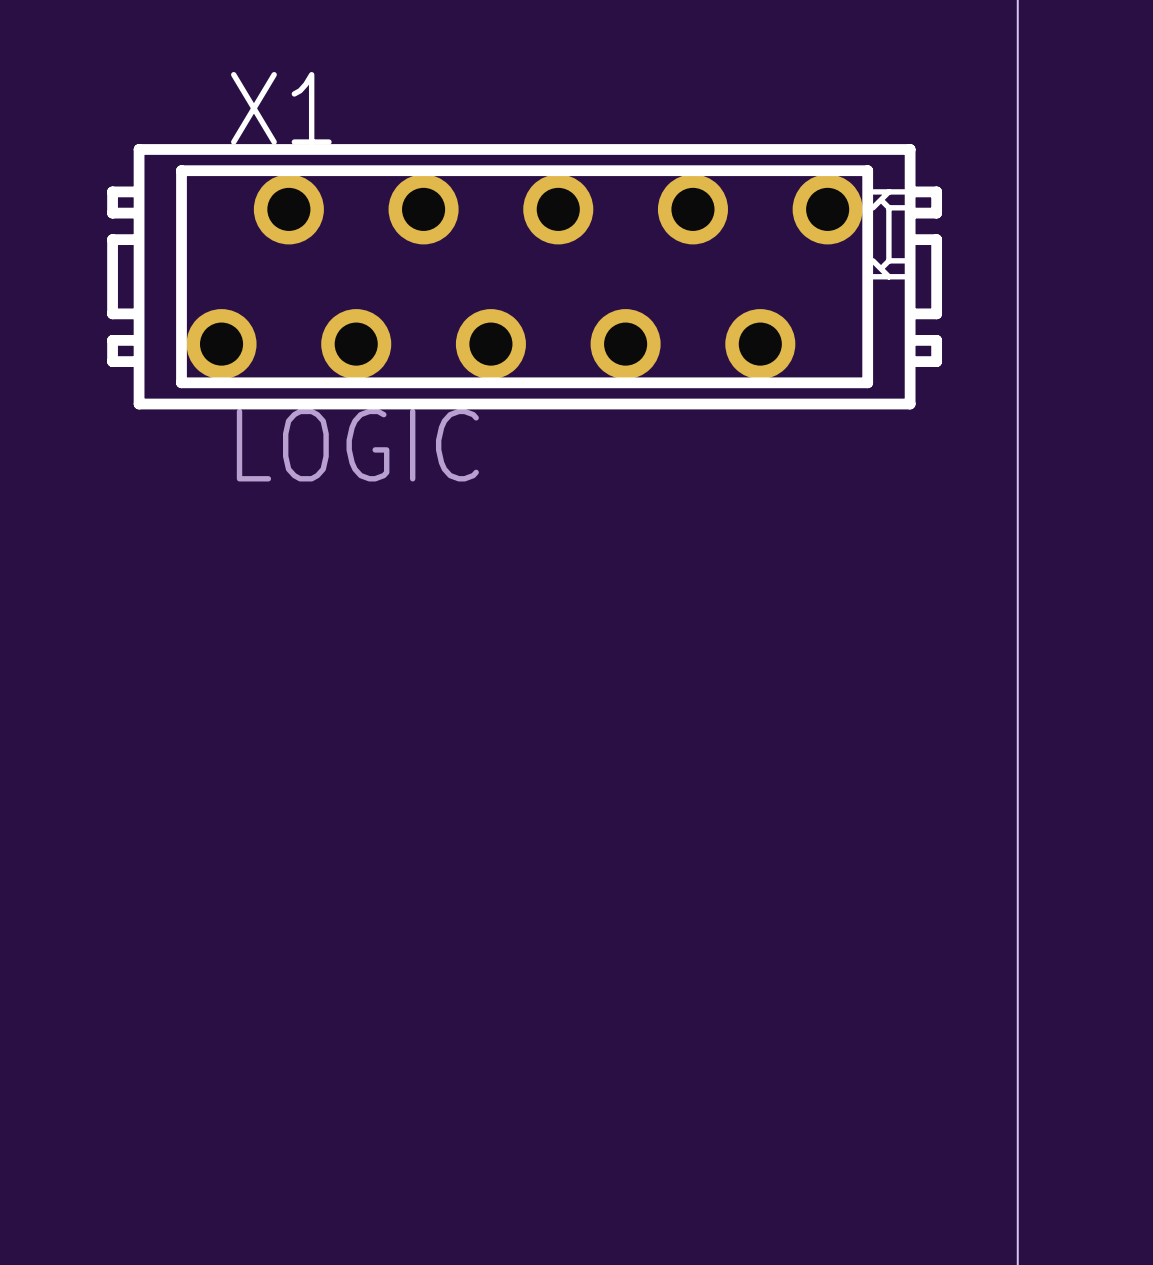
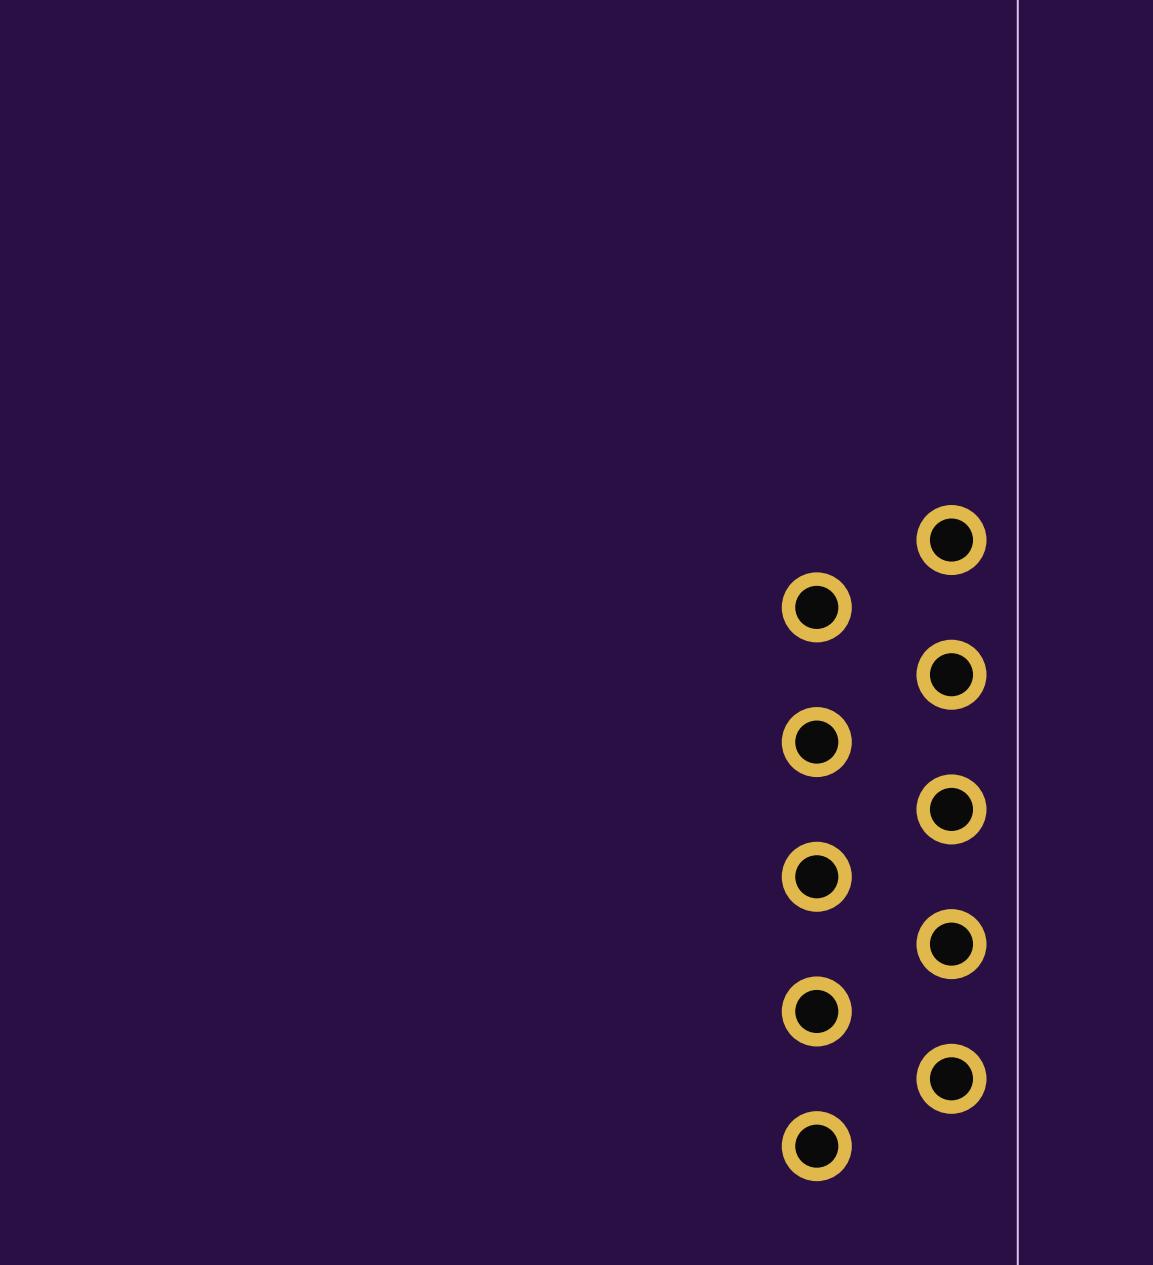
X1 side: bottom (524, 276) -> top (884, 843)

